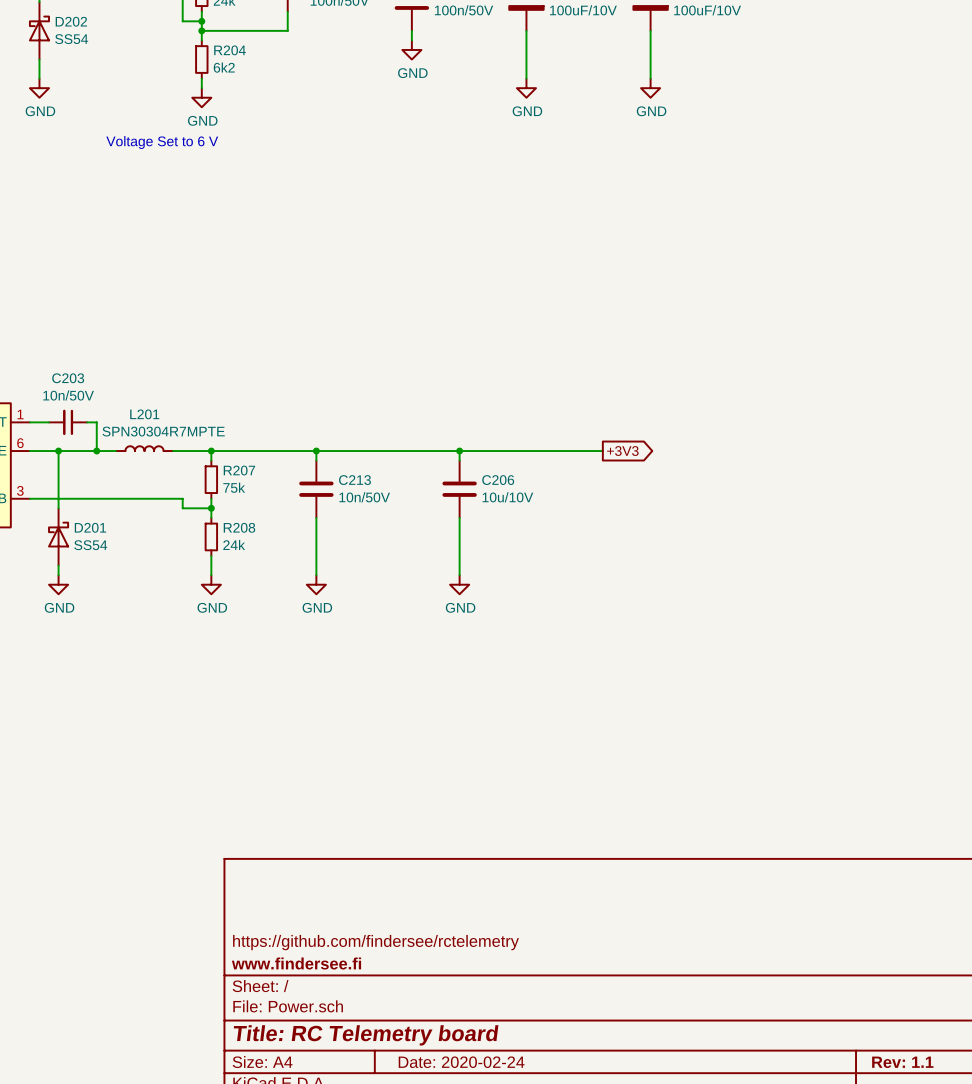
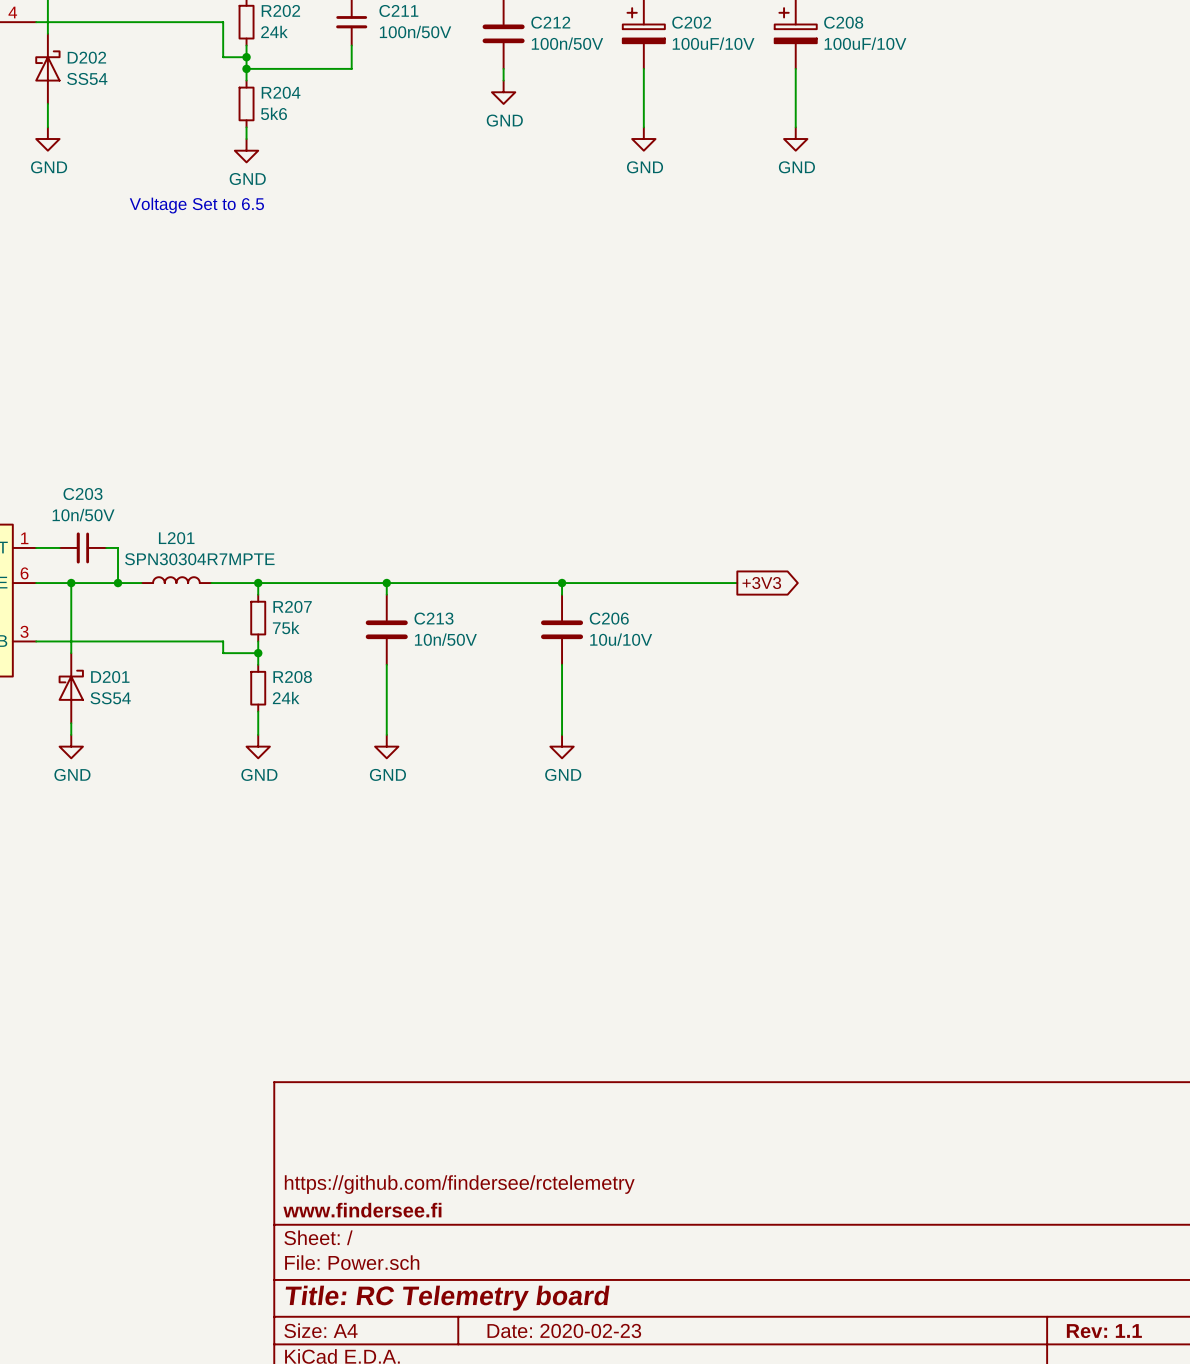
R204 value: 6k2 (224, 67) -> 5k6 (273, 113)
text: Voltage Set to 6 V (162, 142) -> Voltage Set to 6.5 (196, 205)
title block: Date: 2020-02-24 (461, 1062) -> Date: 2020-02-23 (564, 1330)

